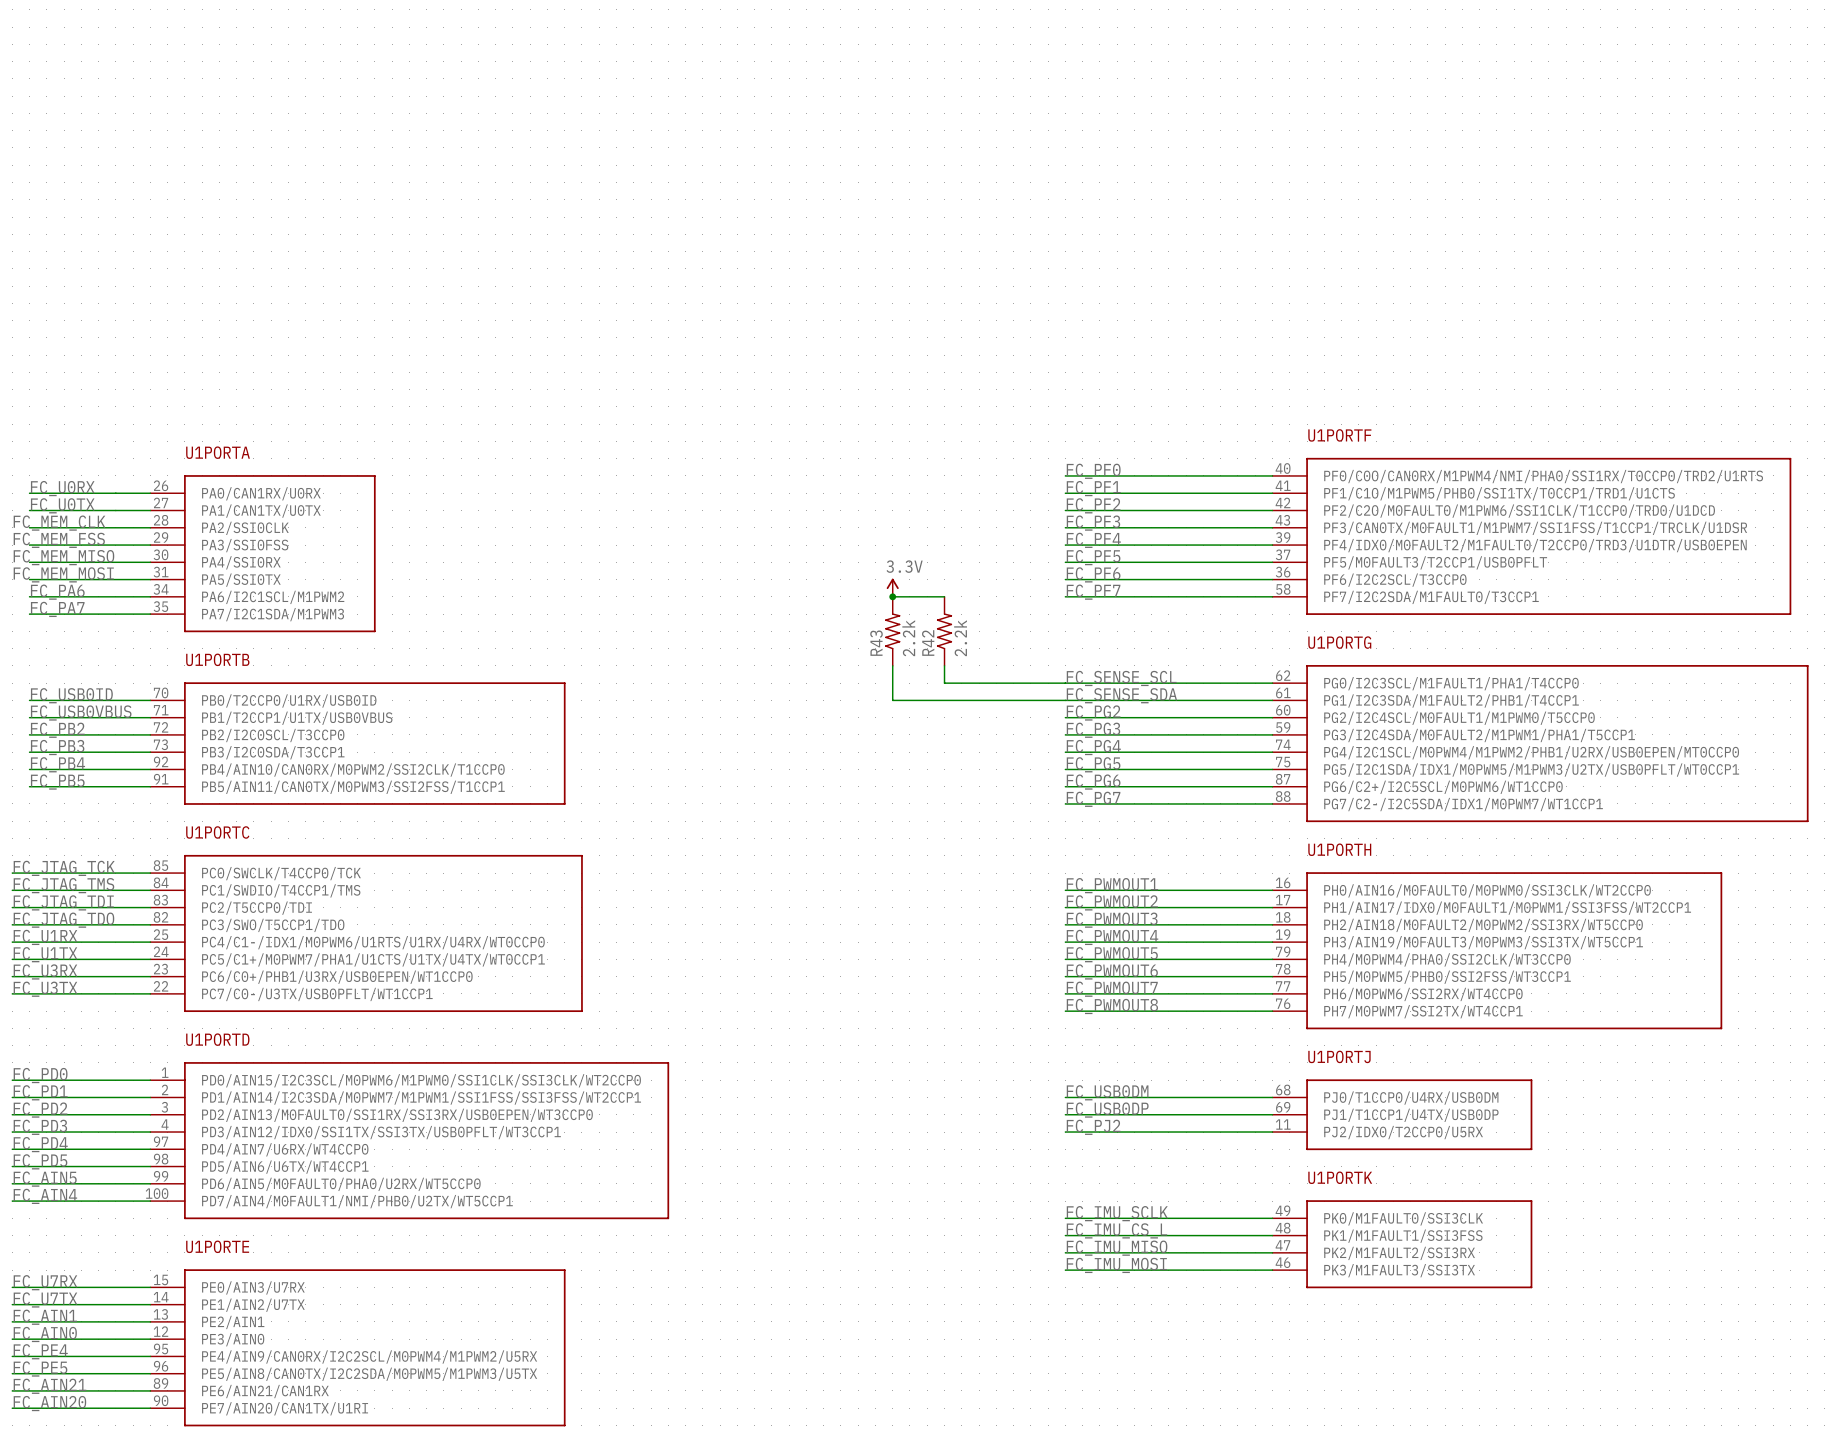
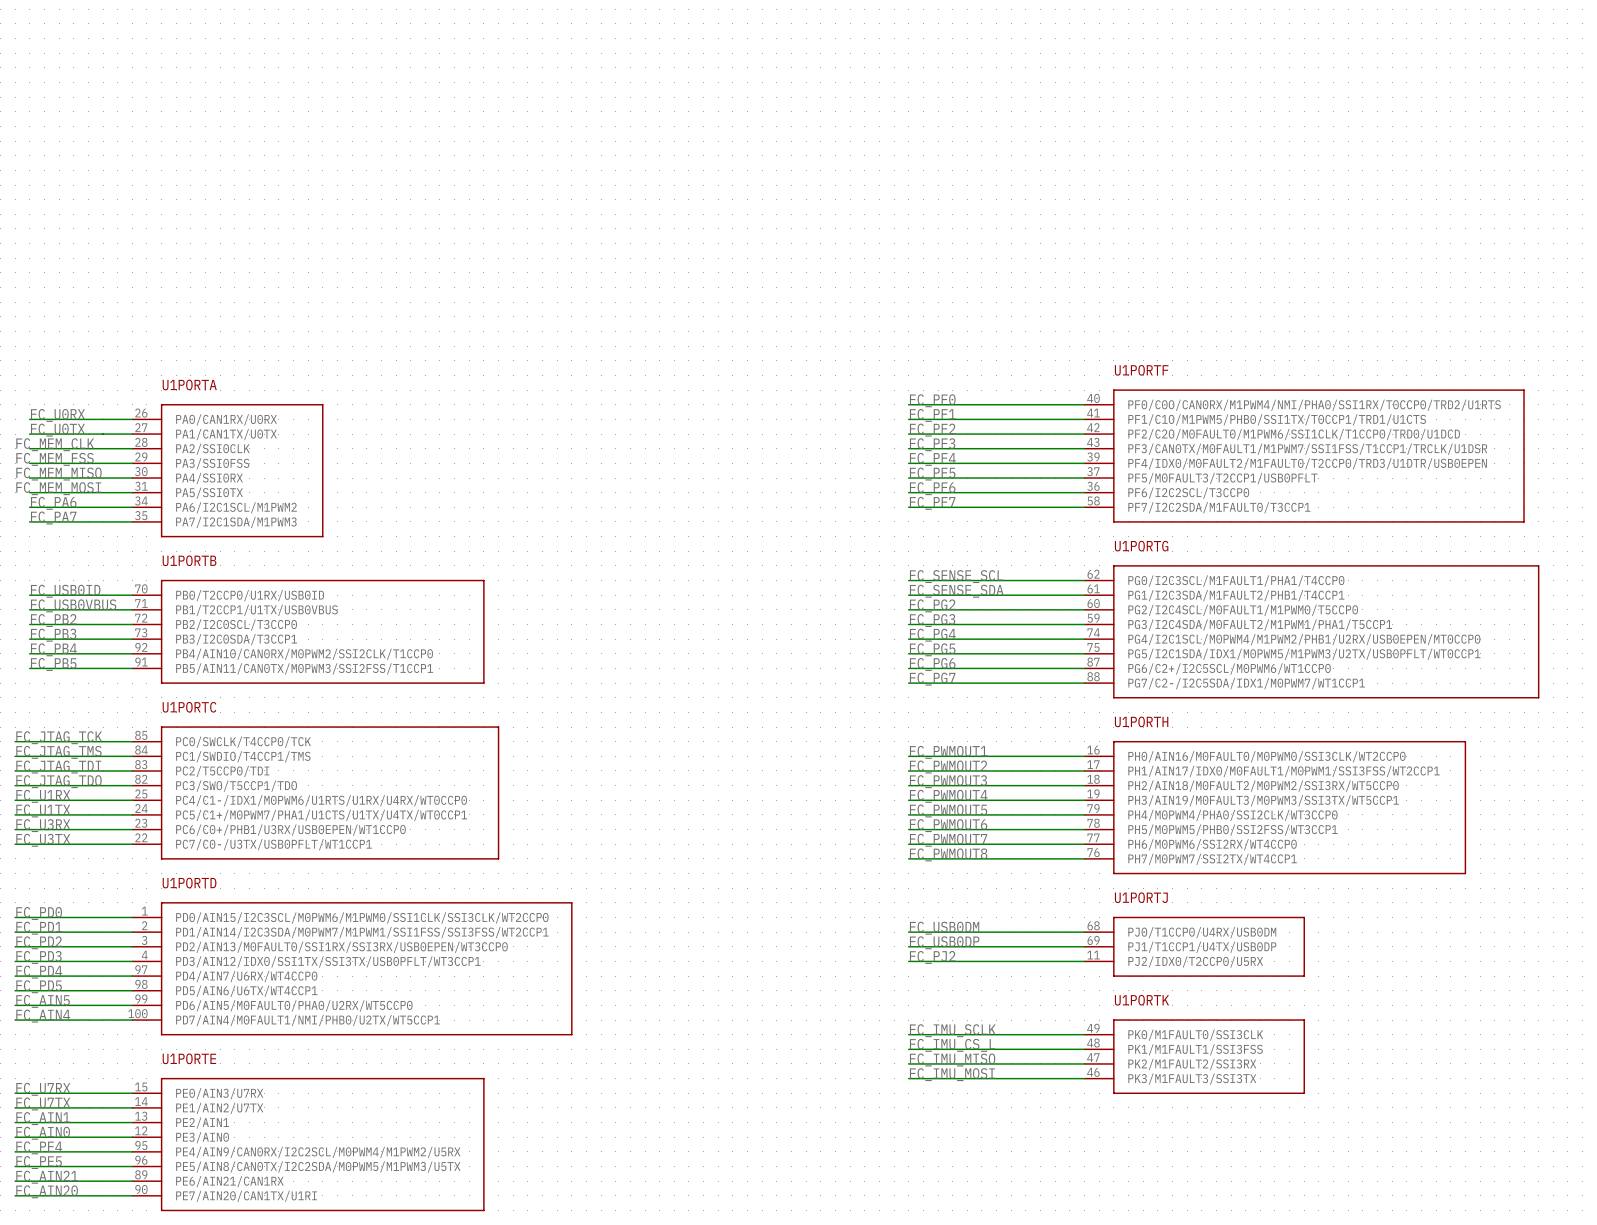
power symbol: 3.3V (892, 587) -> none
wire: (892, 596) (944, 596) -> none
junction: (892, 596) -> none
R43: 2.2k (892, 631) -> none
R42: 2.2k (944, 631) -> none
wire: (892, 665) (892, 700) (1065, 700) -> none
wire: (944, 665) (944, 683) (1065, 683) -> none

